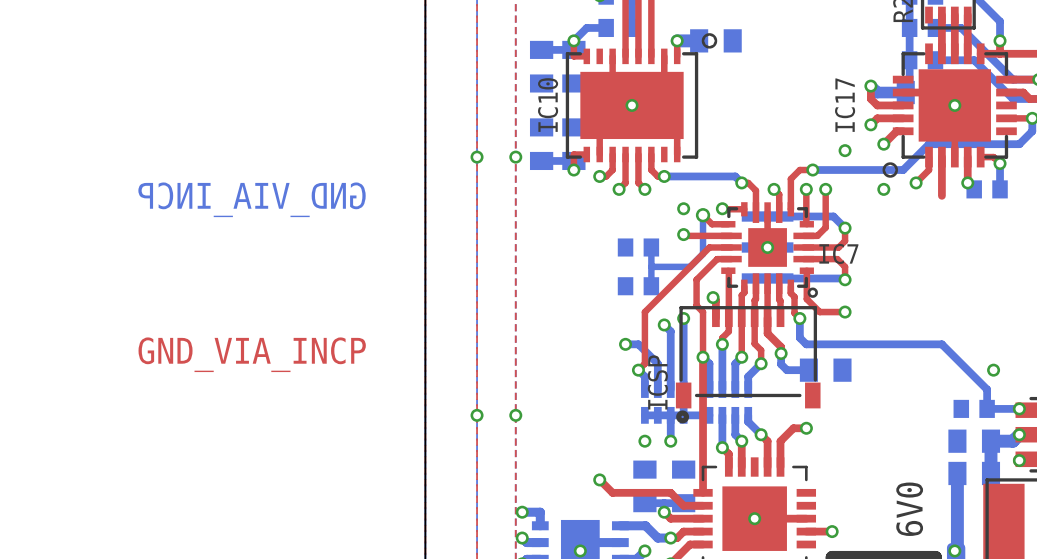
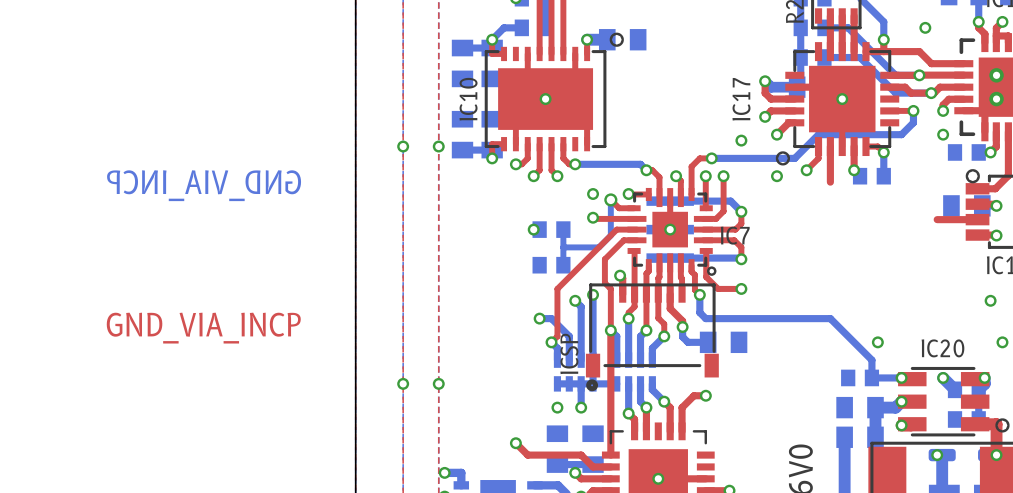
via: none -> (533, 229)

